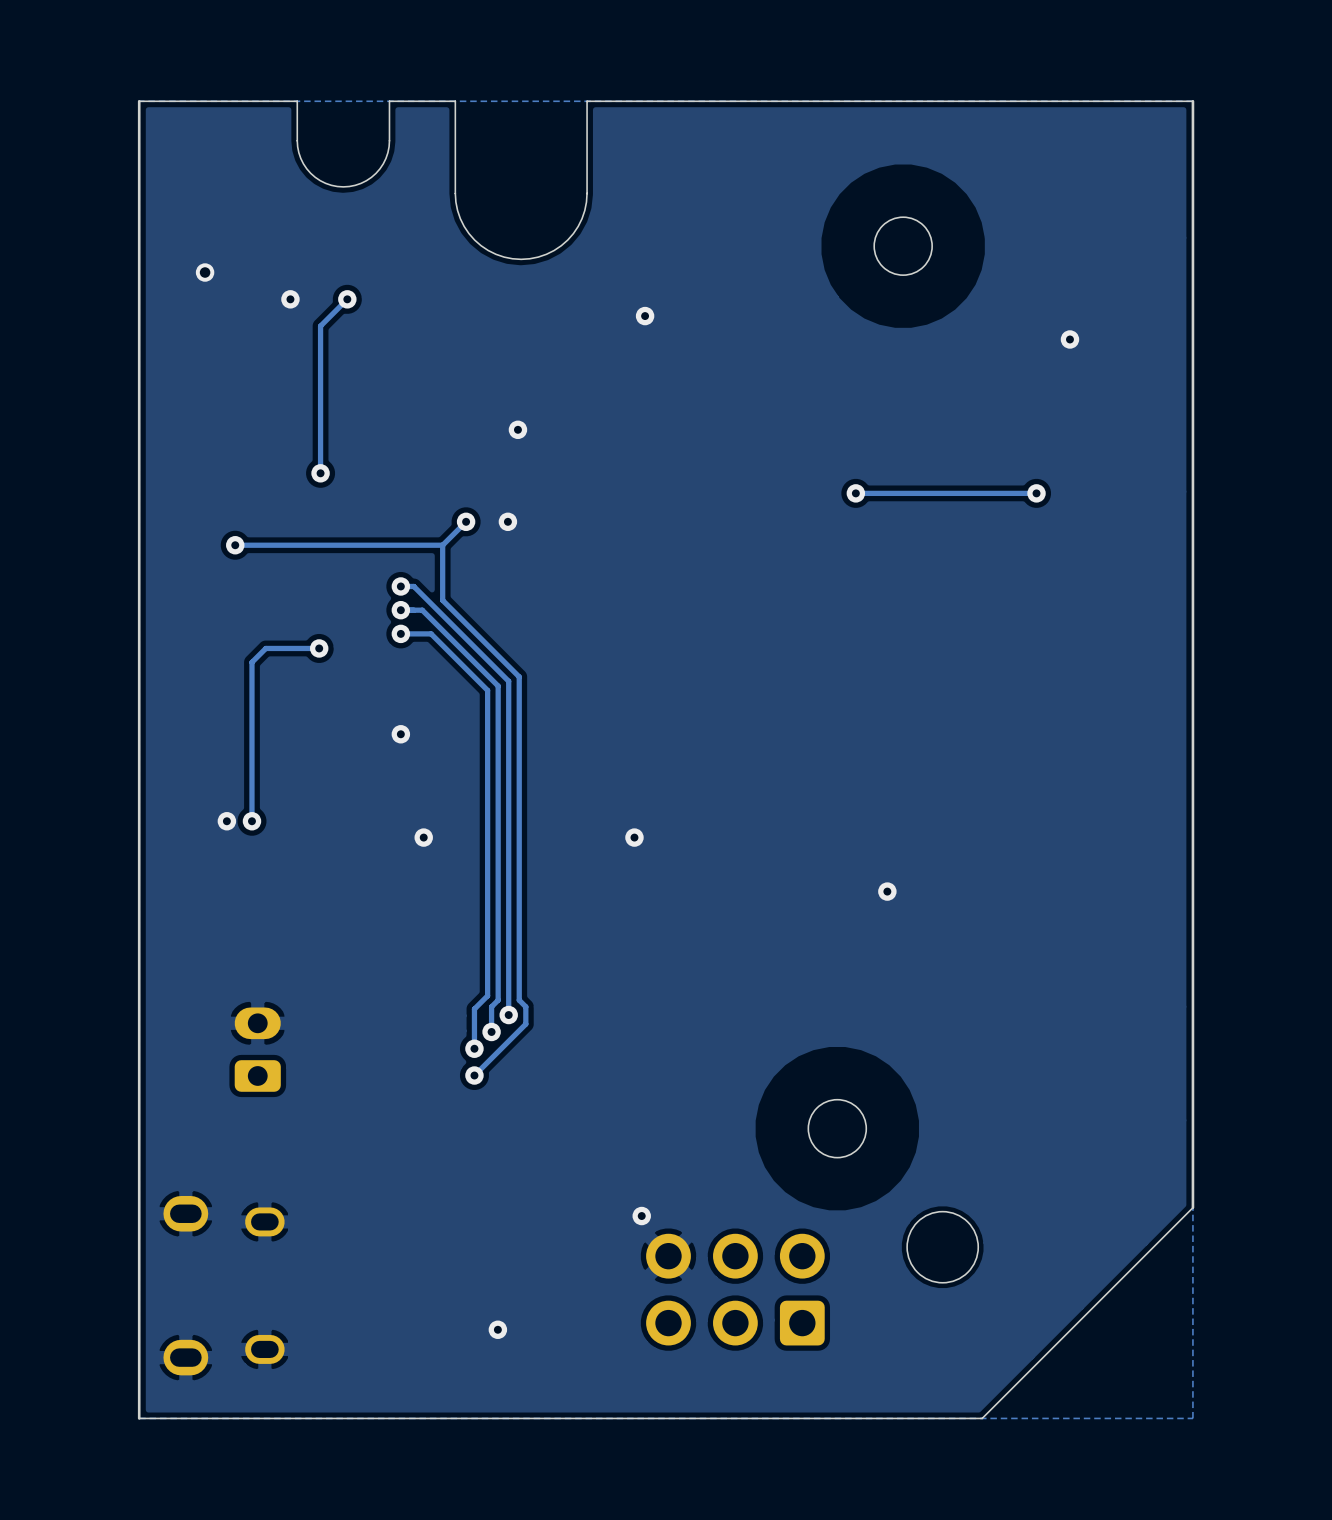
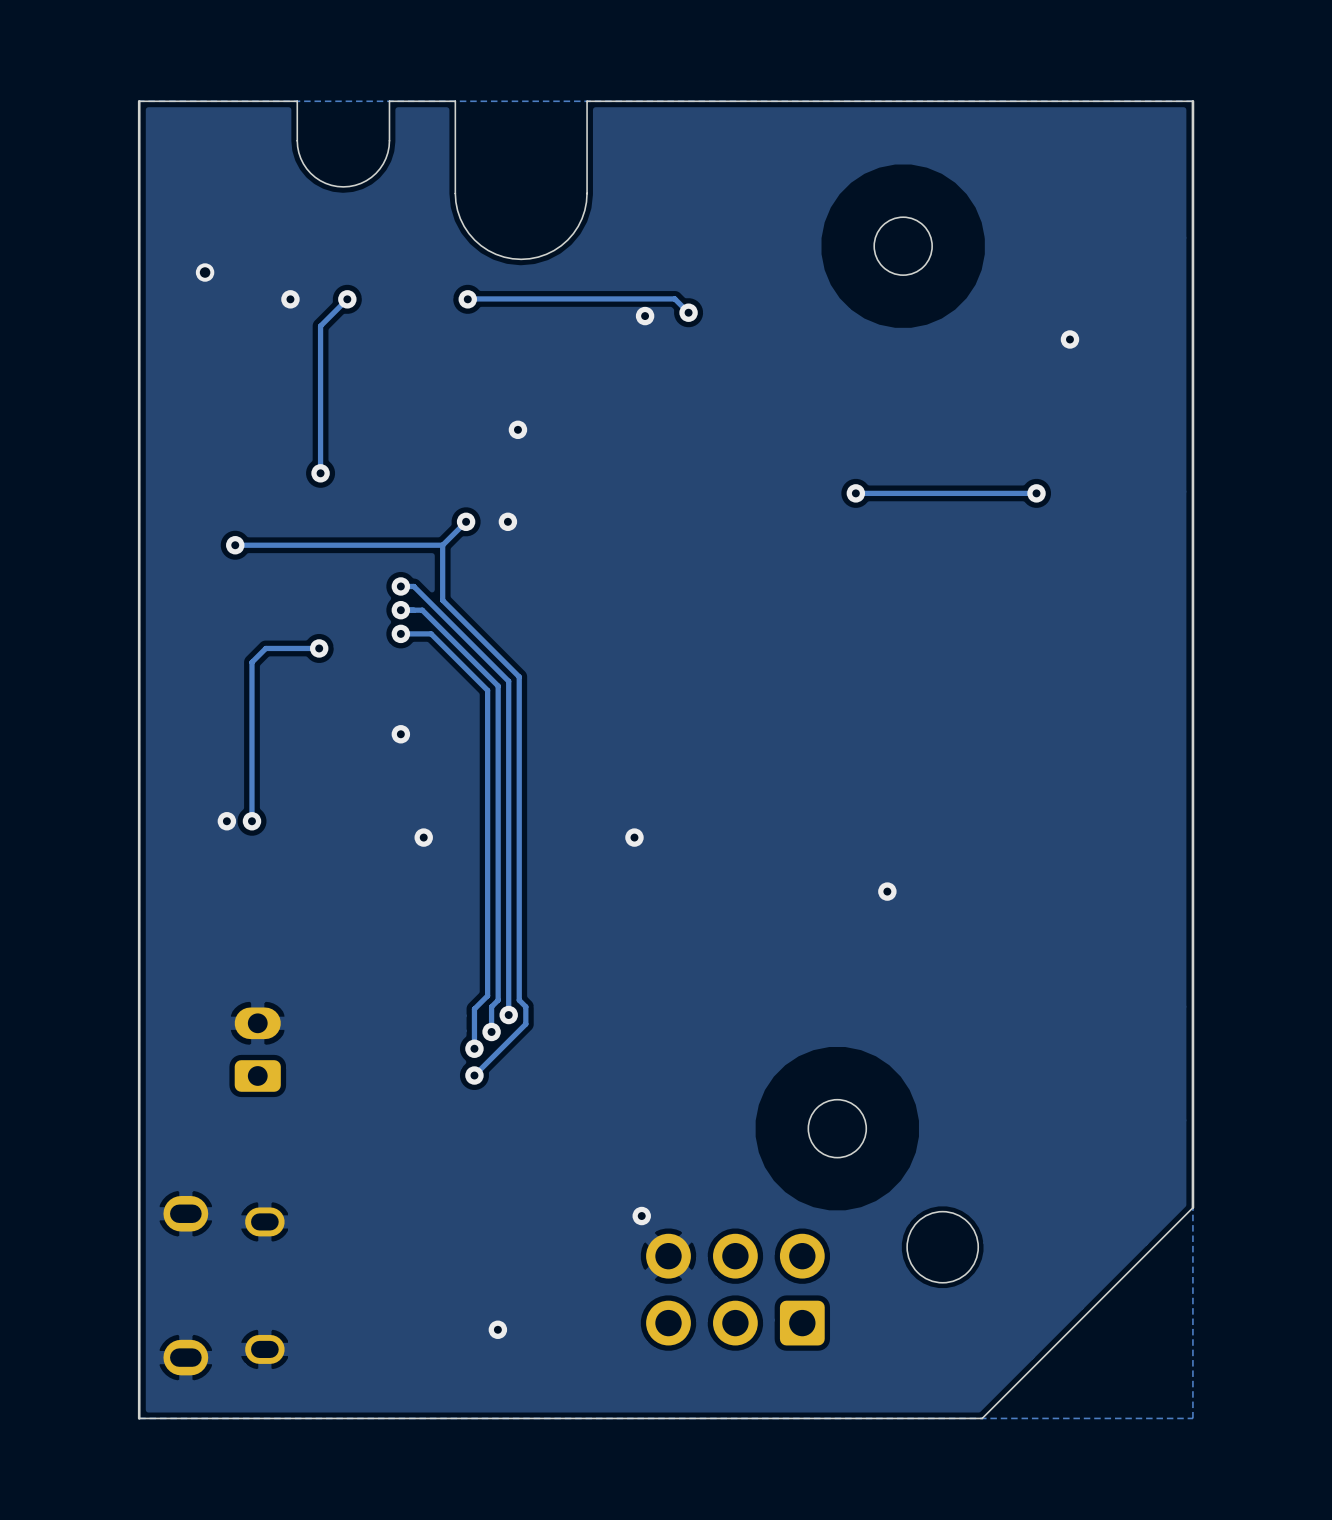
track: none -> (467, 299) (674, 298) (688, 312)
via: none -> (467, 299)
via: none -> (688, 312)

